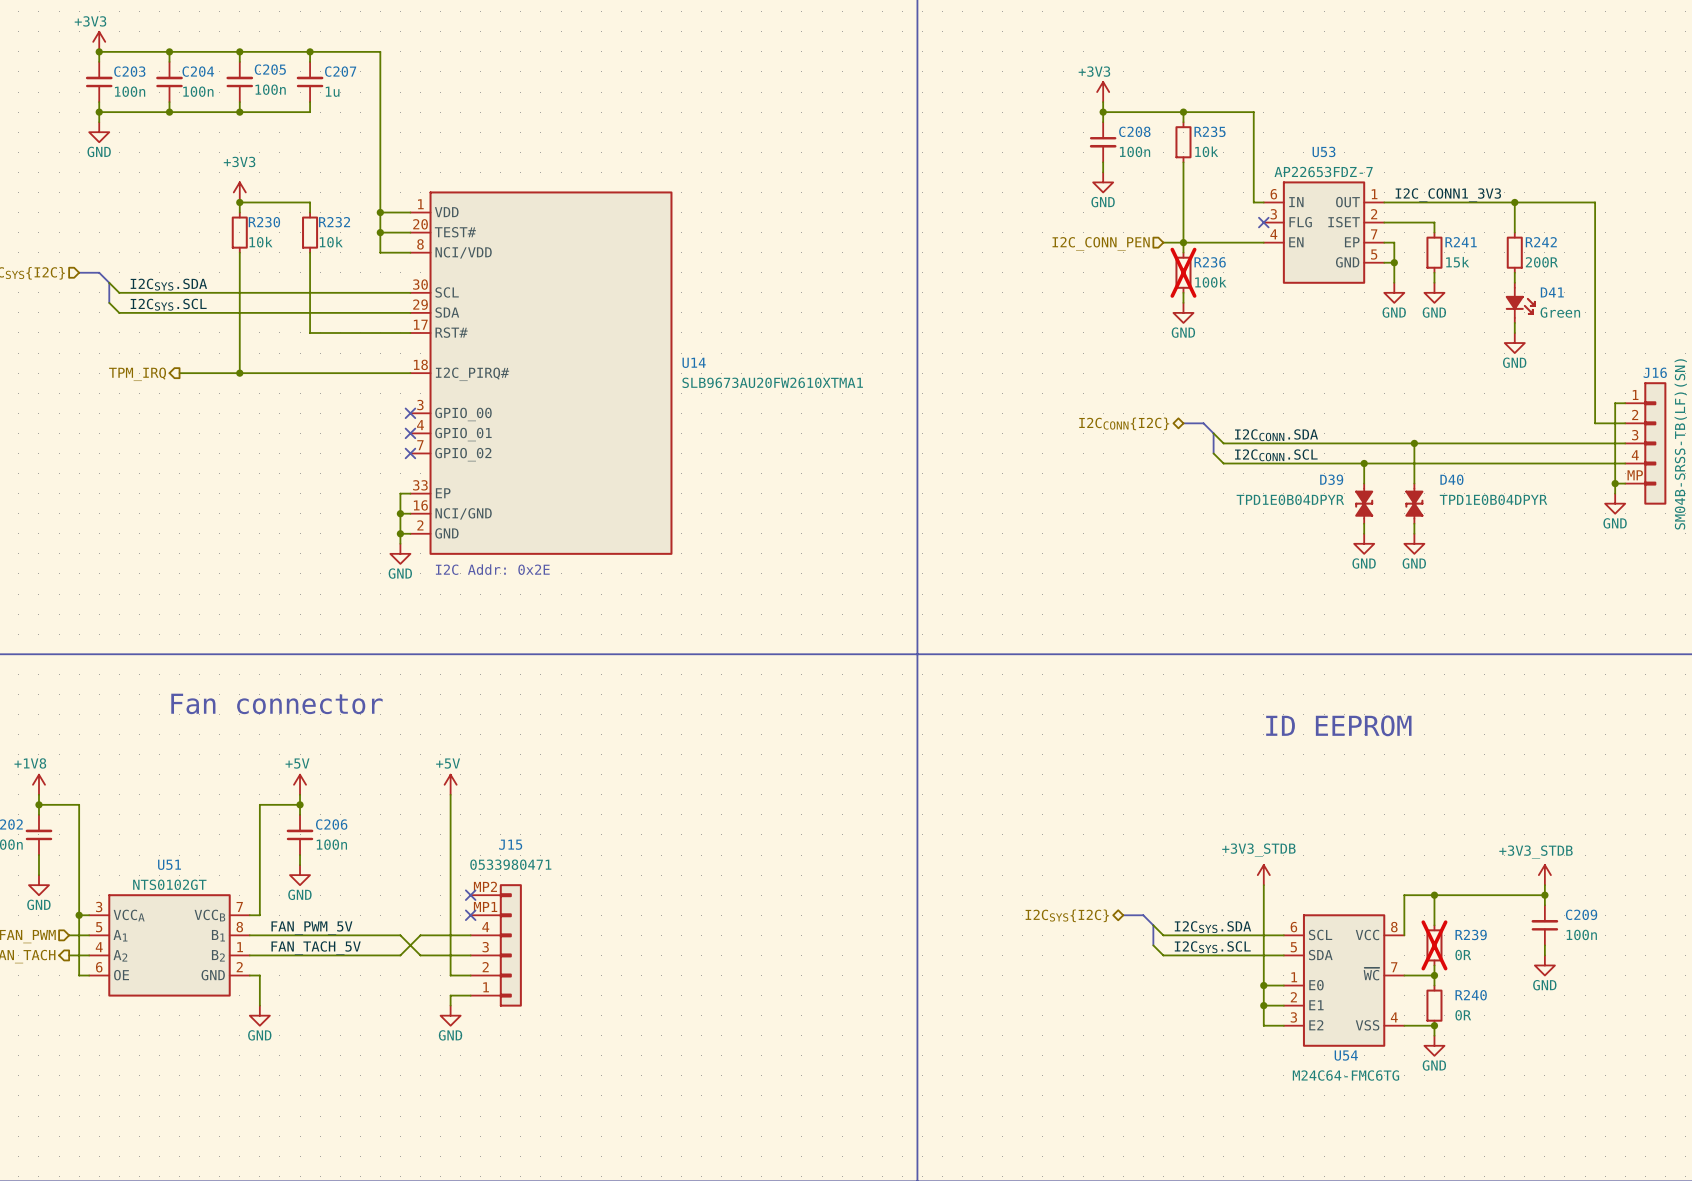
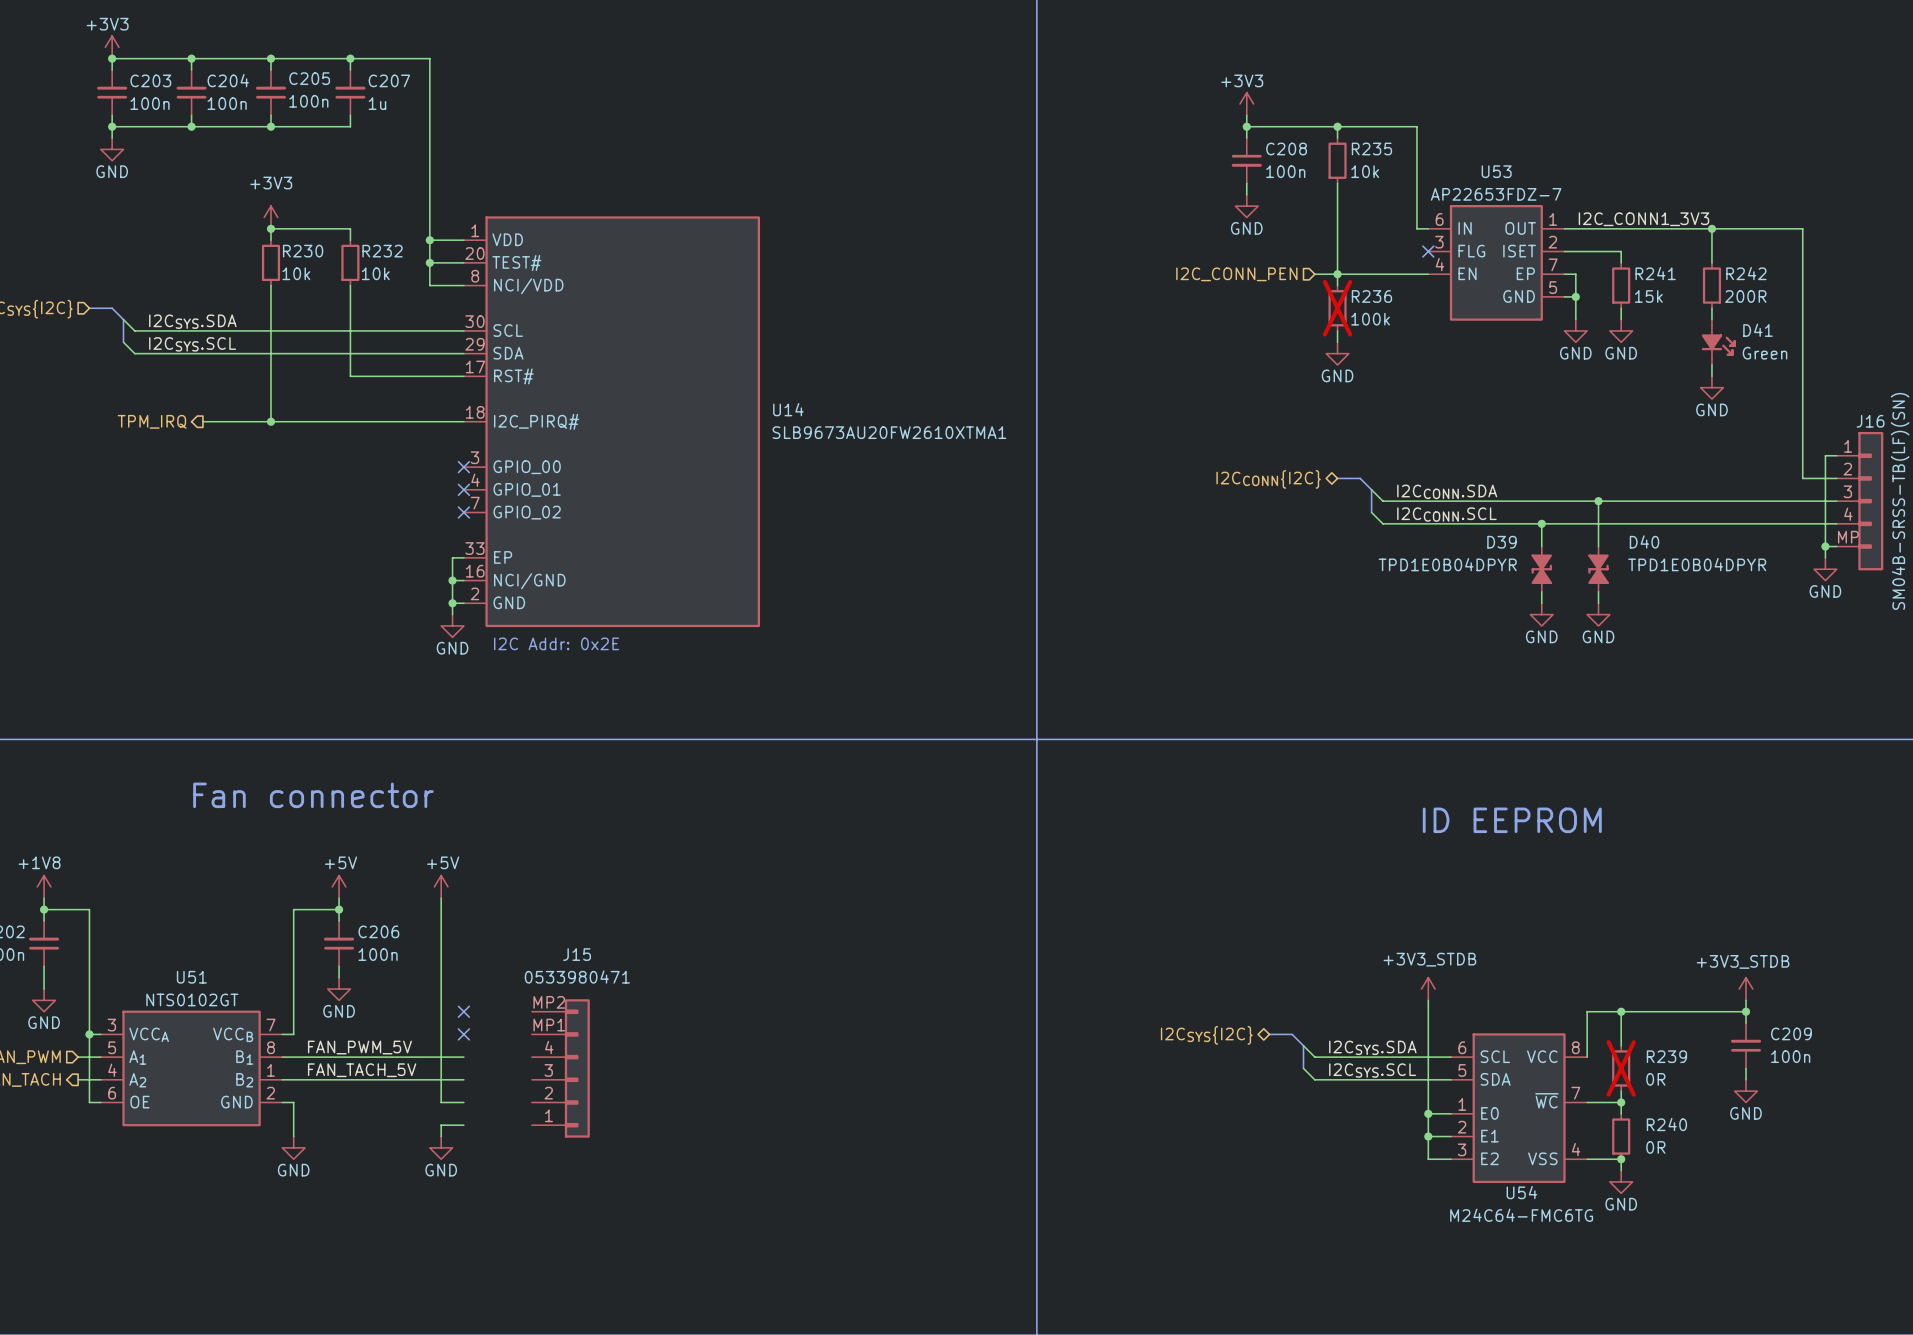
power symbol position: +5V (450, 784) -> +5V (441, 886)
wire: (450, 794) (450, 975) (470, 975) -> (441, 898) (441, 1102) (463, 1102)
no-connect mark: none -> (463, 1011)
no-connect mark: (470, 895) -> none
no-connect mark: none -> (463, 1034)
no-connect mark: (470, 915) -> none
wire: (400, 935) (420, 955) (470, 955) -> (452, 1057) (463, 1057)
wire: (470, 935) (420, 935) (400, 955) -> (463, 1079) (452, 1079)
wire: (470, 995) (450, 995) (450, 1005) -> (463, 1125) (441, 1125) (441, 1136)
power symbol position: GND (450, 1015) -> GND (441, 1147)

